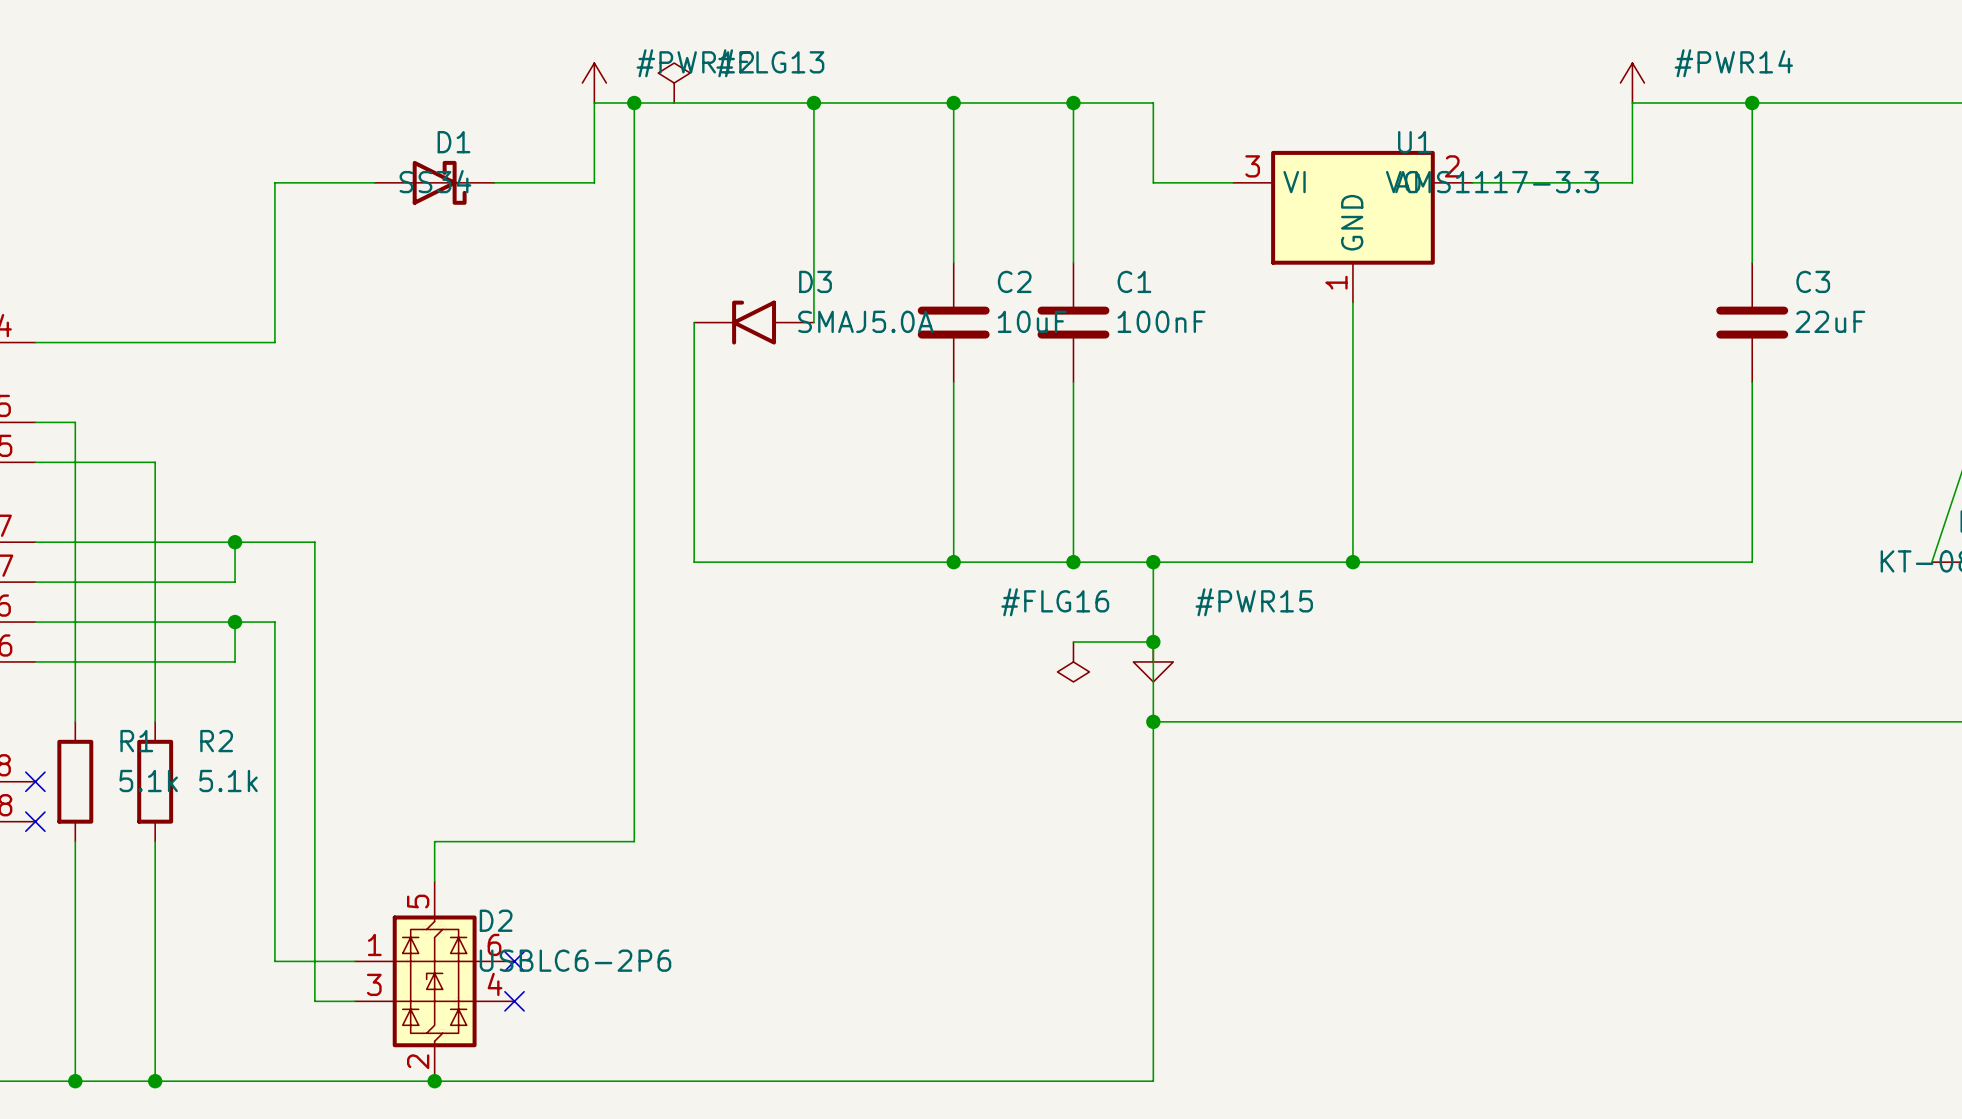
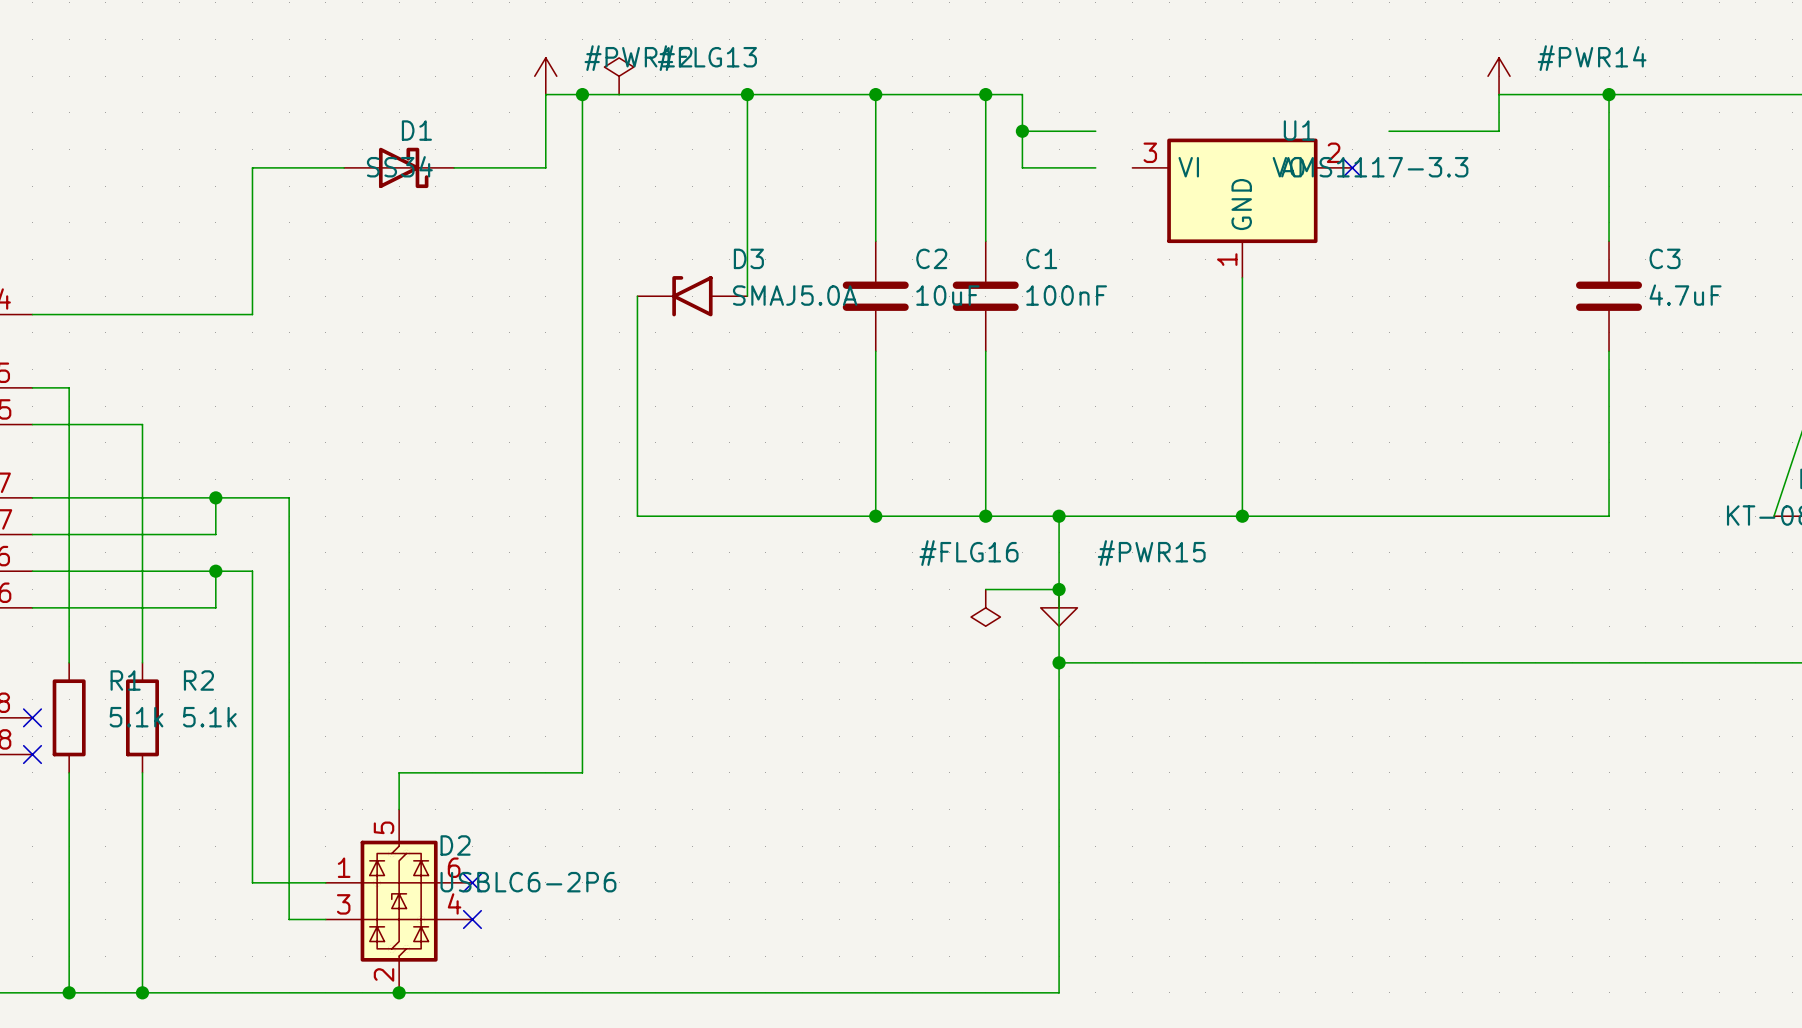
wire: (1113, 103) (1153, 103) (1153, 182) -> (1022, 94) (1022, 167) (1059, 167)
wire: none -> (1022, 131) (1095, 131)
junction: none -> (1022, 131)
wire: (1632, 142) (1632, 182) (1472, 182) -> (1499, 131) (1389, 131)
wire: (1193, 182) (1233, 182) -> none
no-connect mark: none -> (1352, 167)
C3 value: 22uF (1830, 321) -> 4.7uF (1685, 295)

